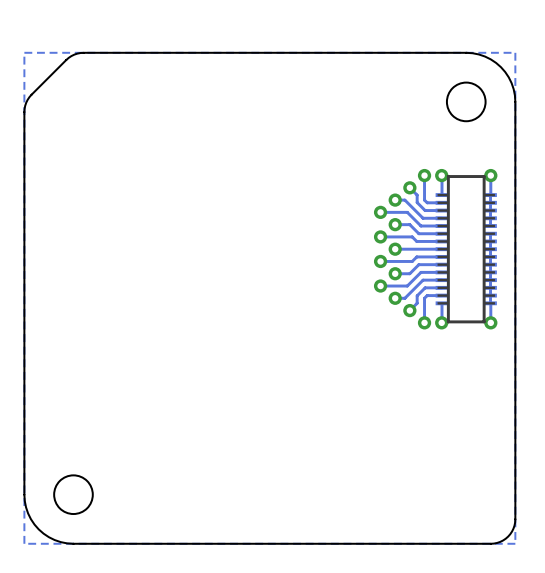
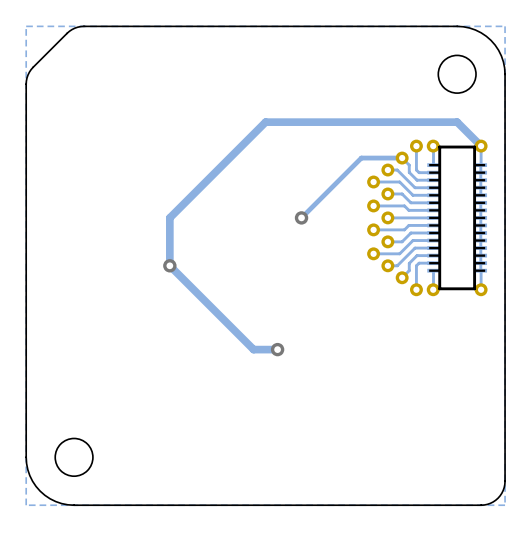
track: none -> (481, 146) (457, 122) (265, 122) (169, 217) (169, 265) (253, 349) (277, 349)
track: none -> (402, 158) (361, 158) (301, 217)
via: none -> (301, 217)
via: none -> (169, 265)
via: none -> (277, 349)

